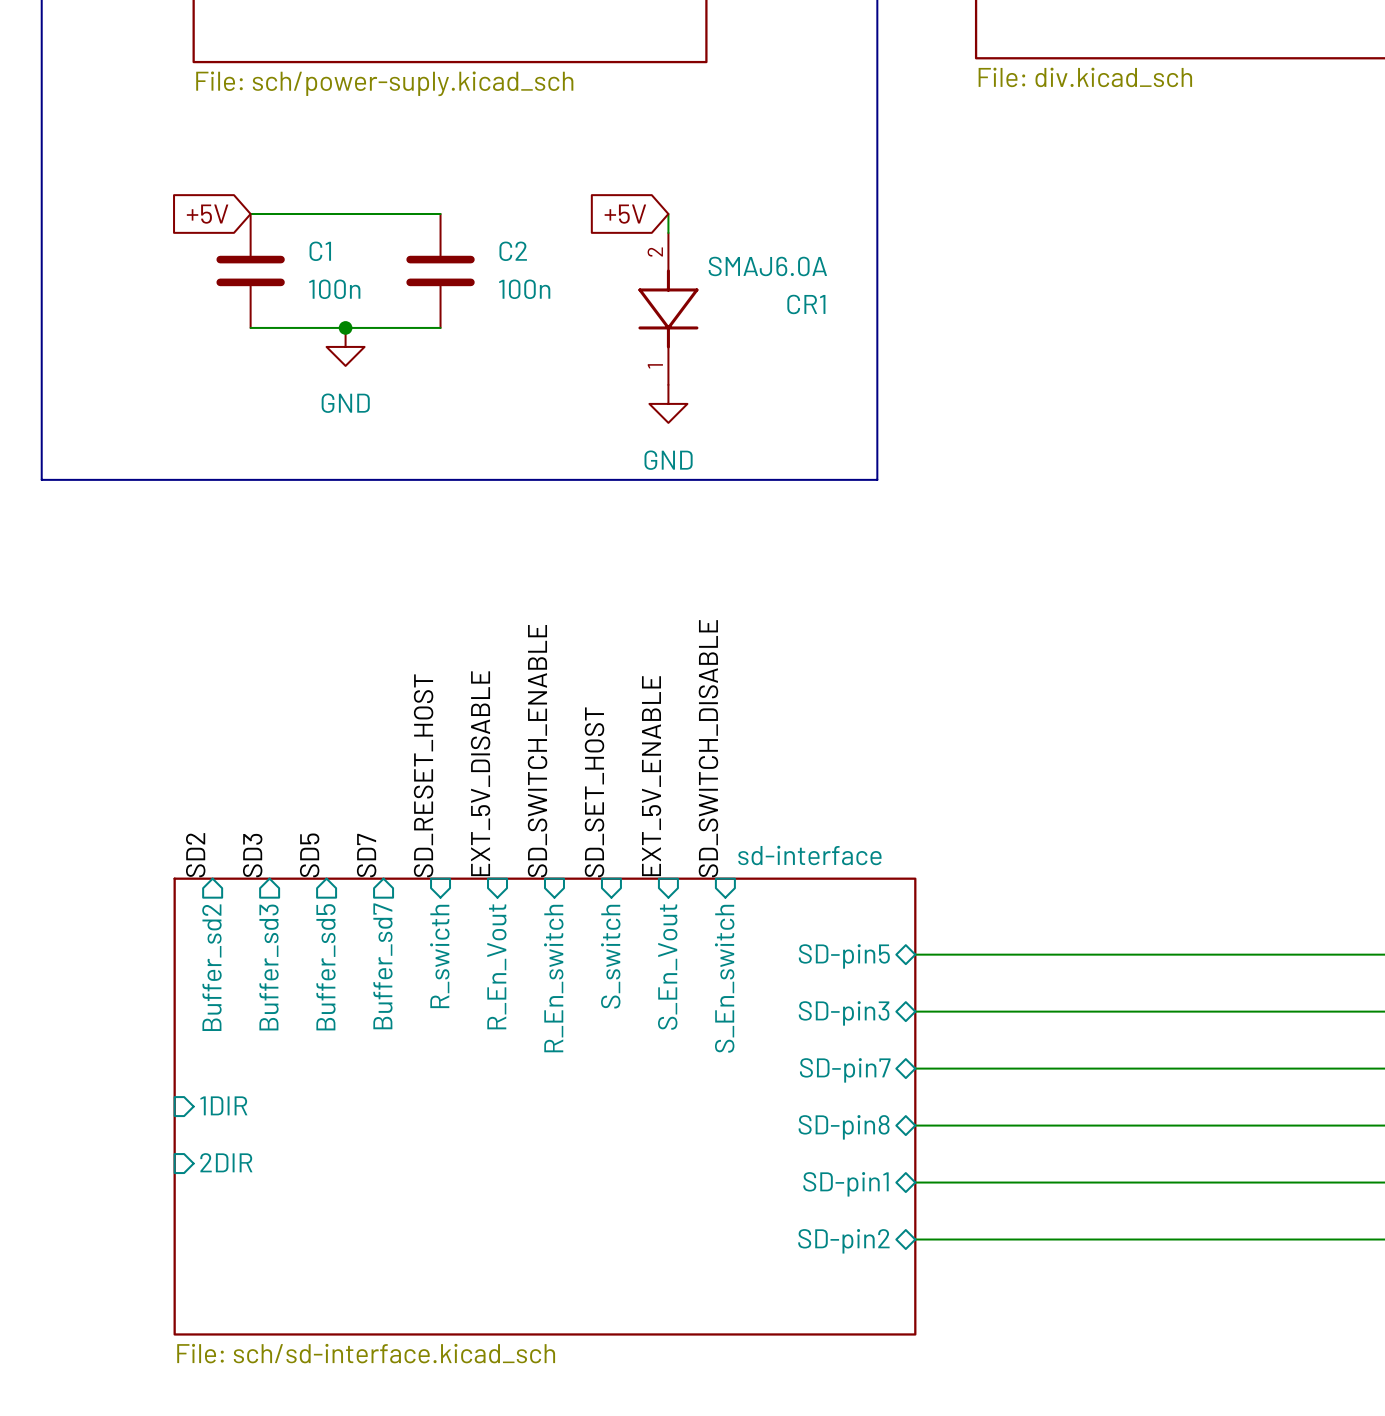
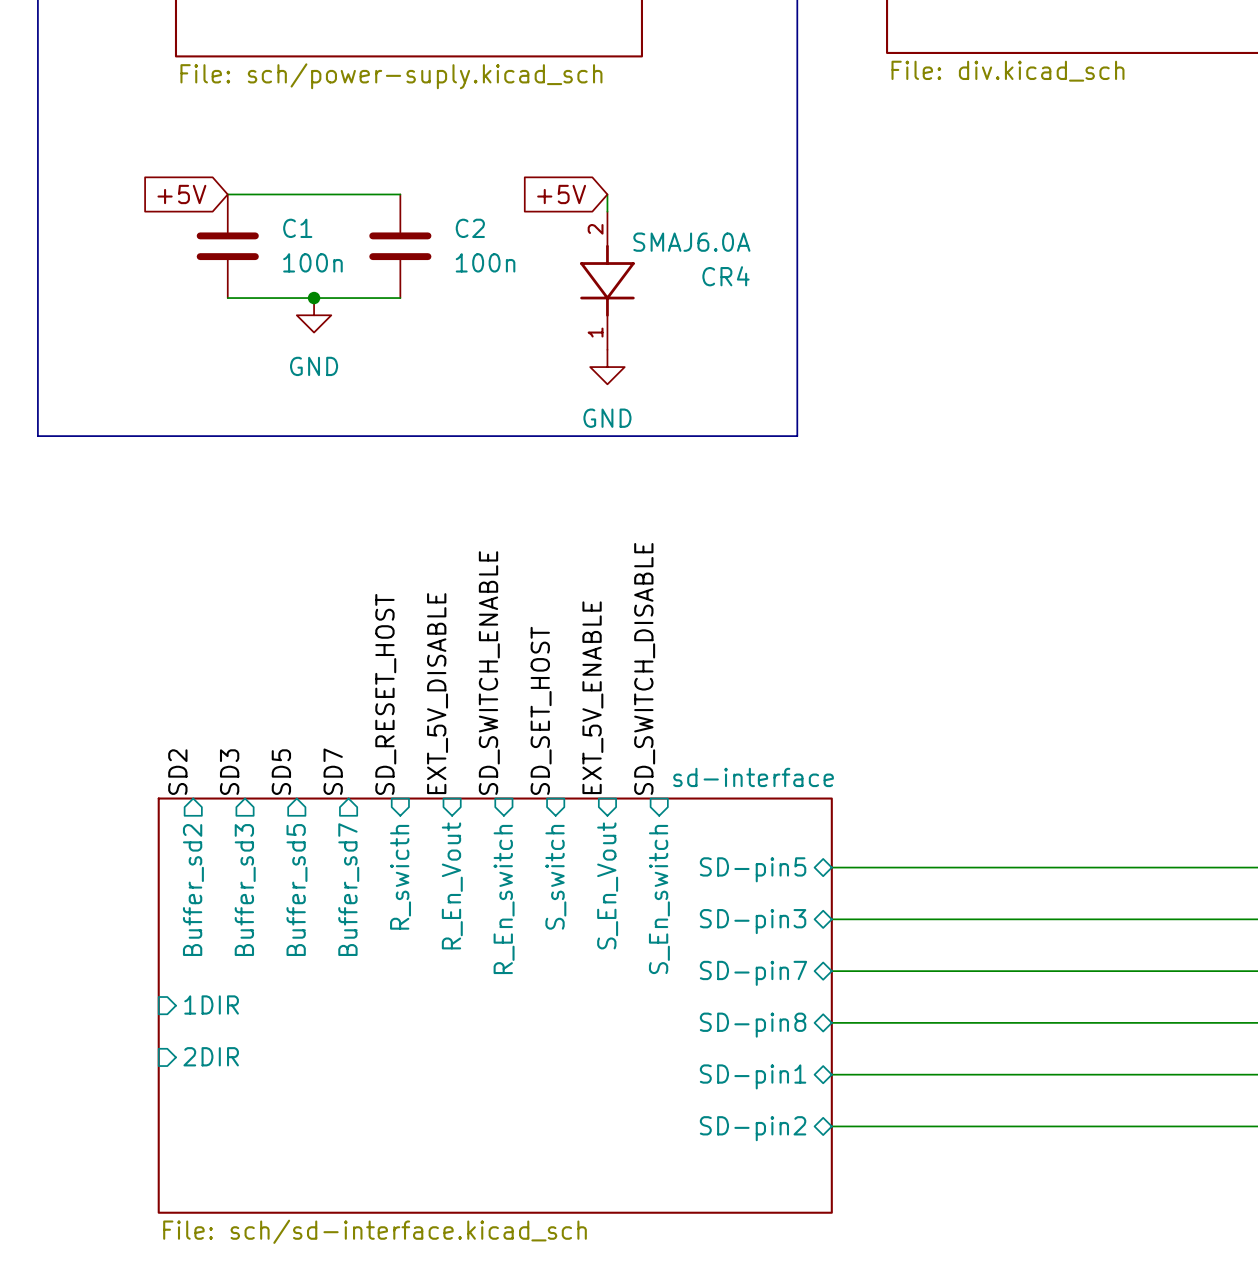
CR1 name: CR1 (806, 304) -> CR4 (726, 276)

